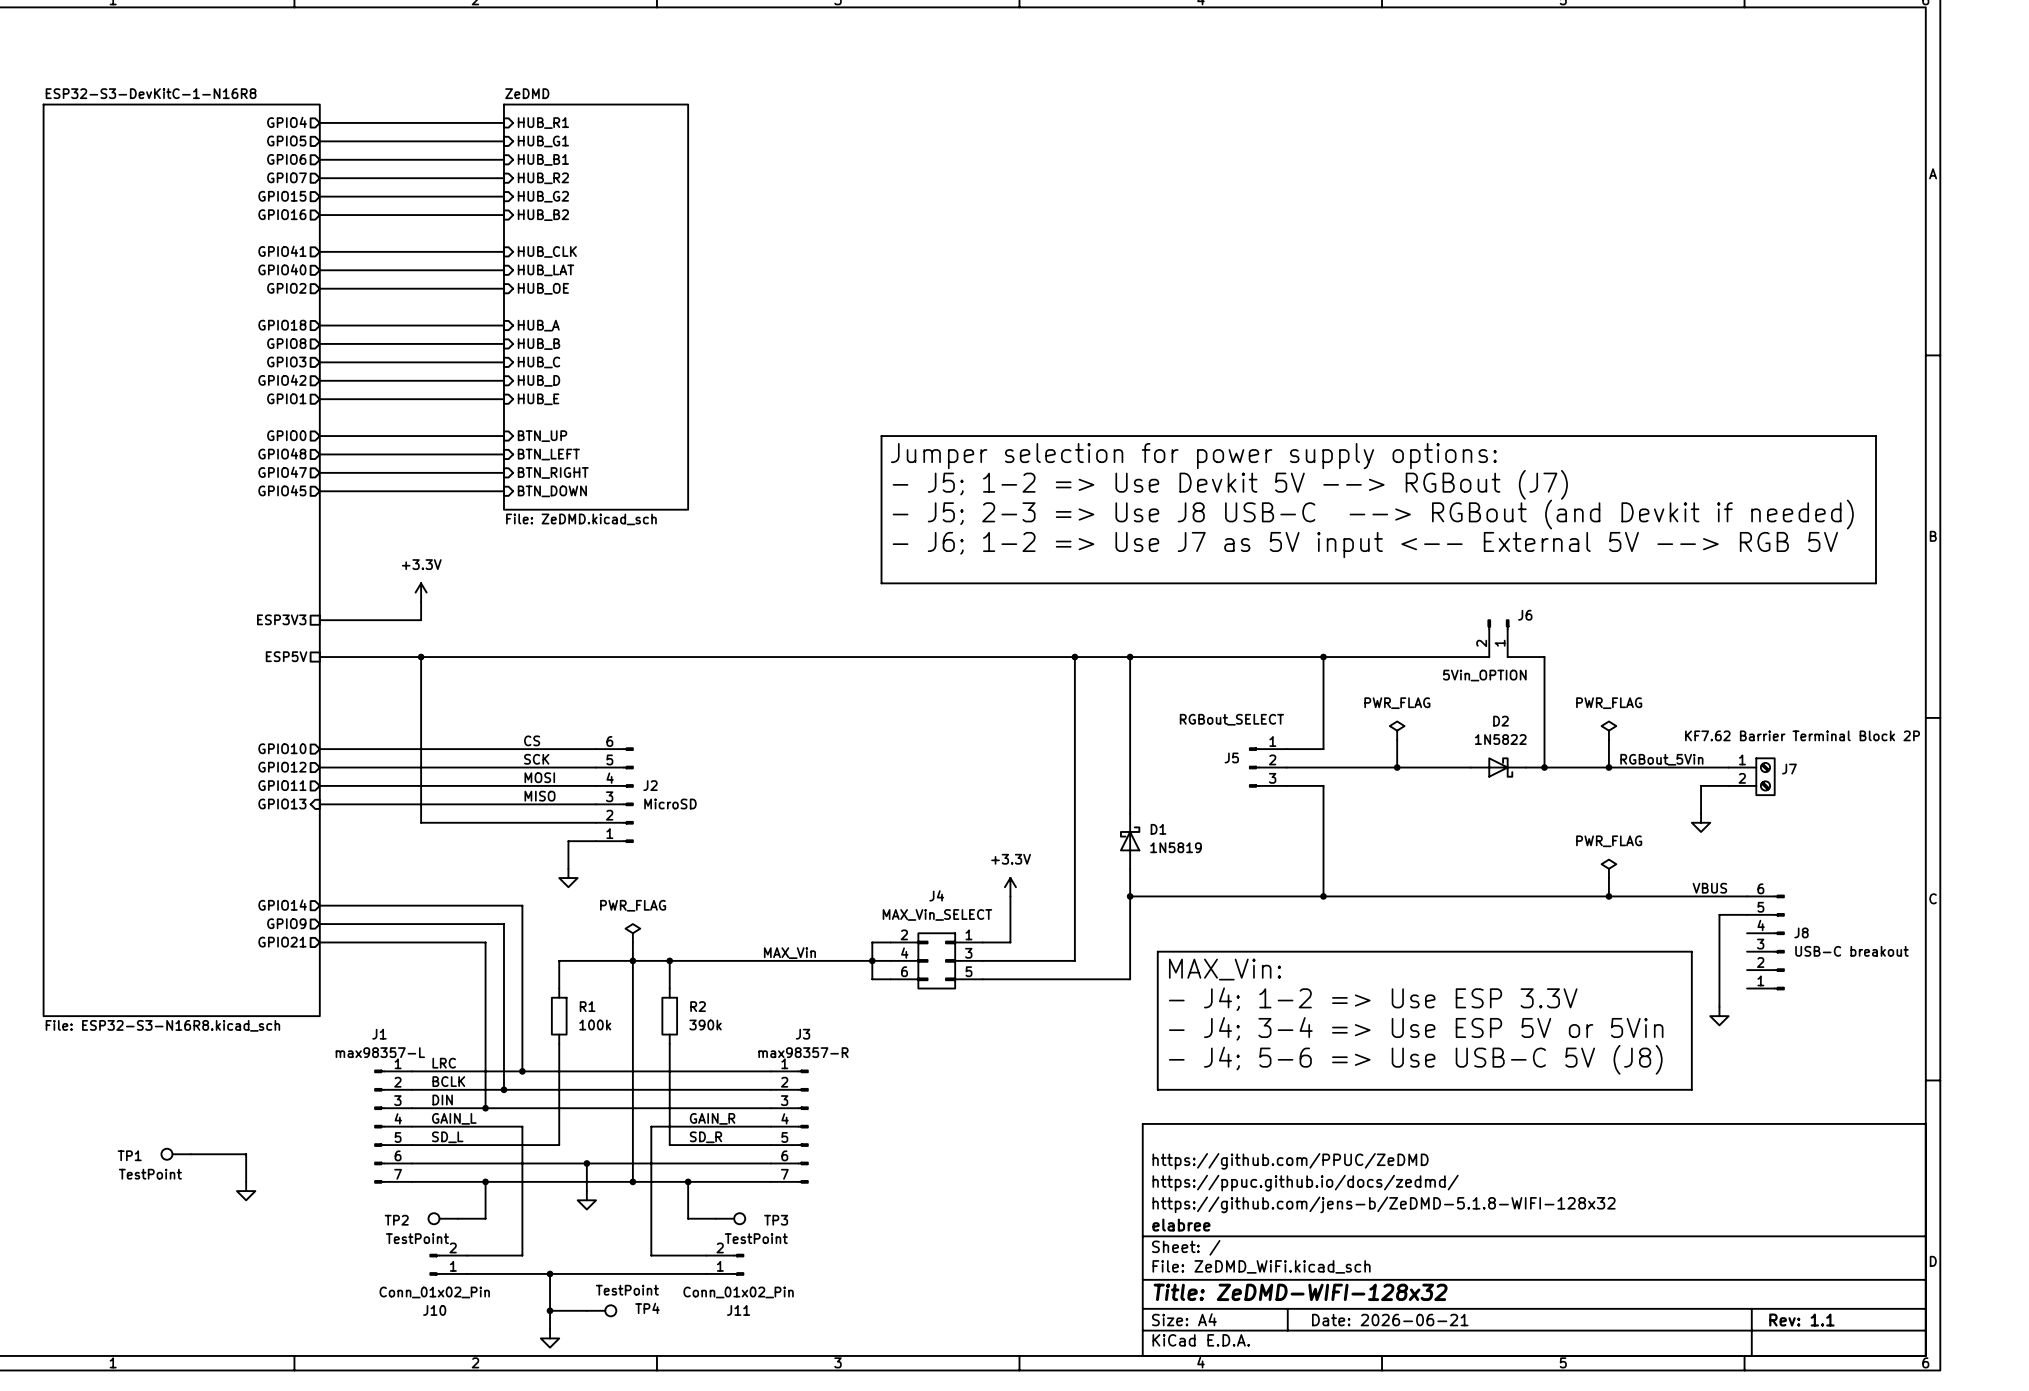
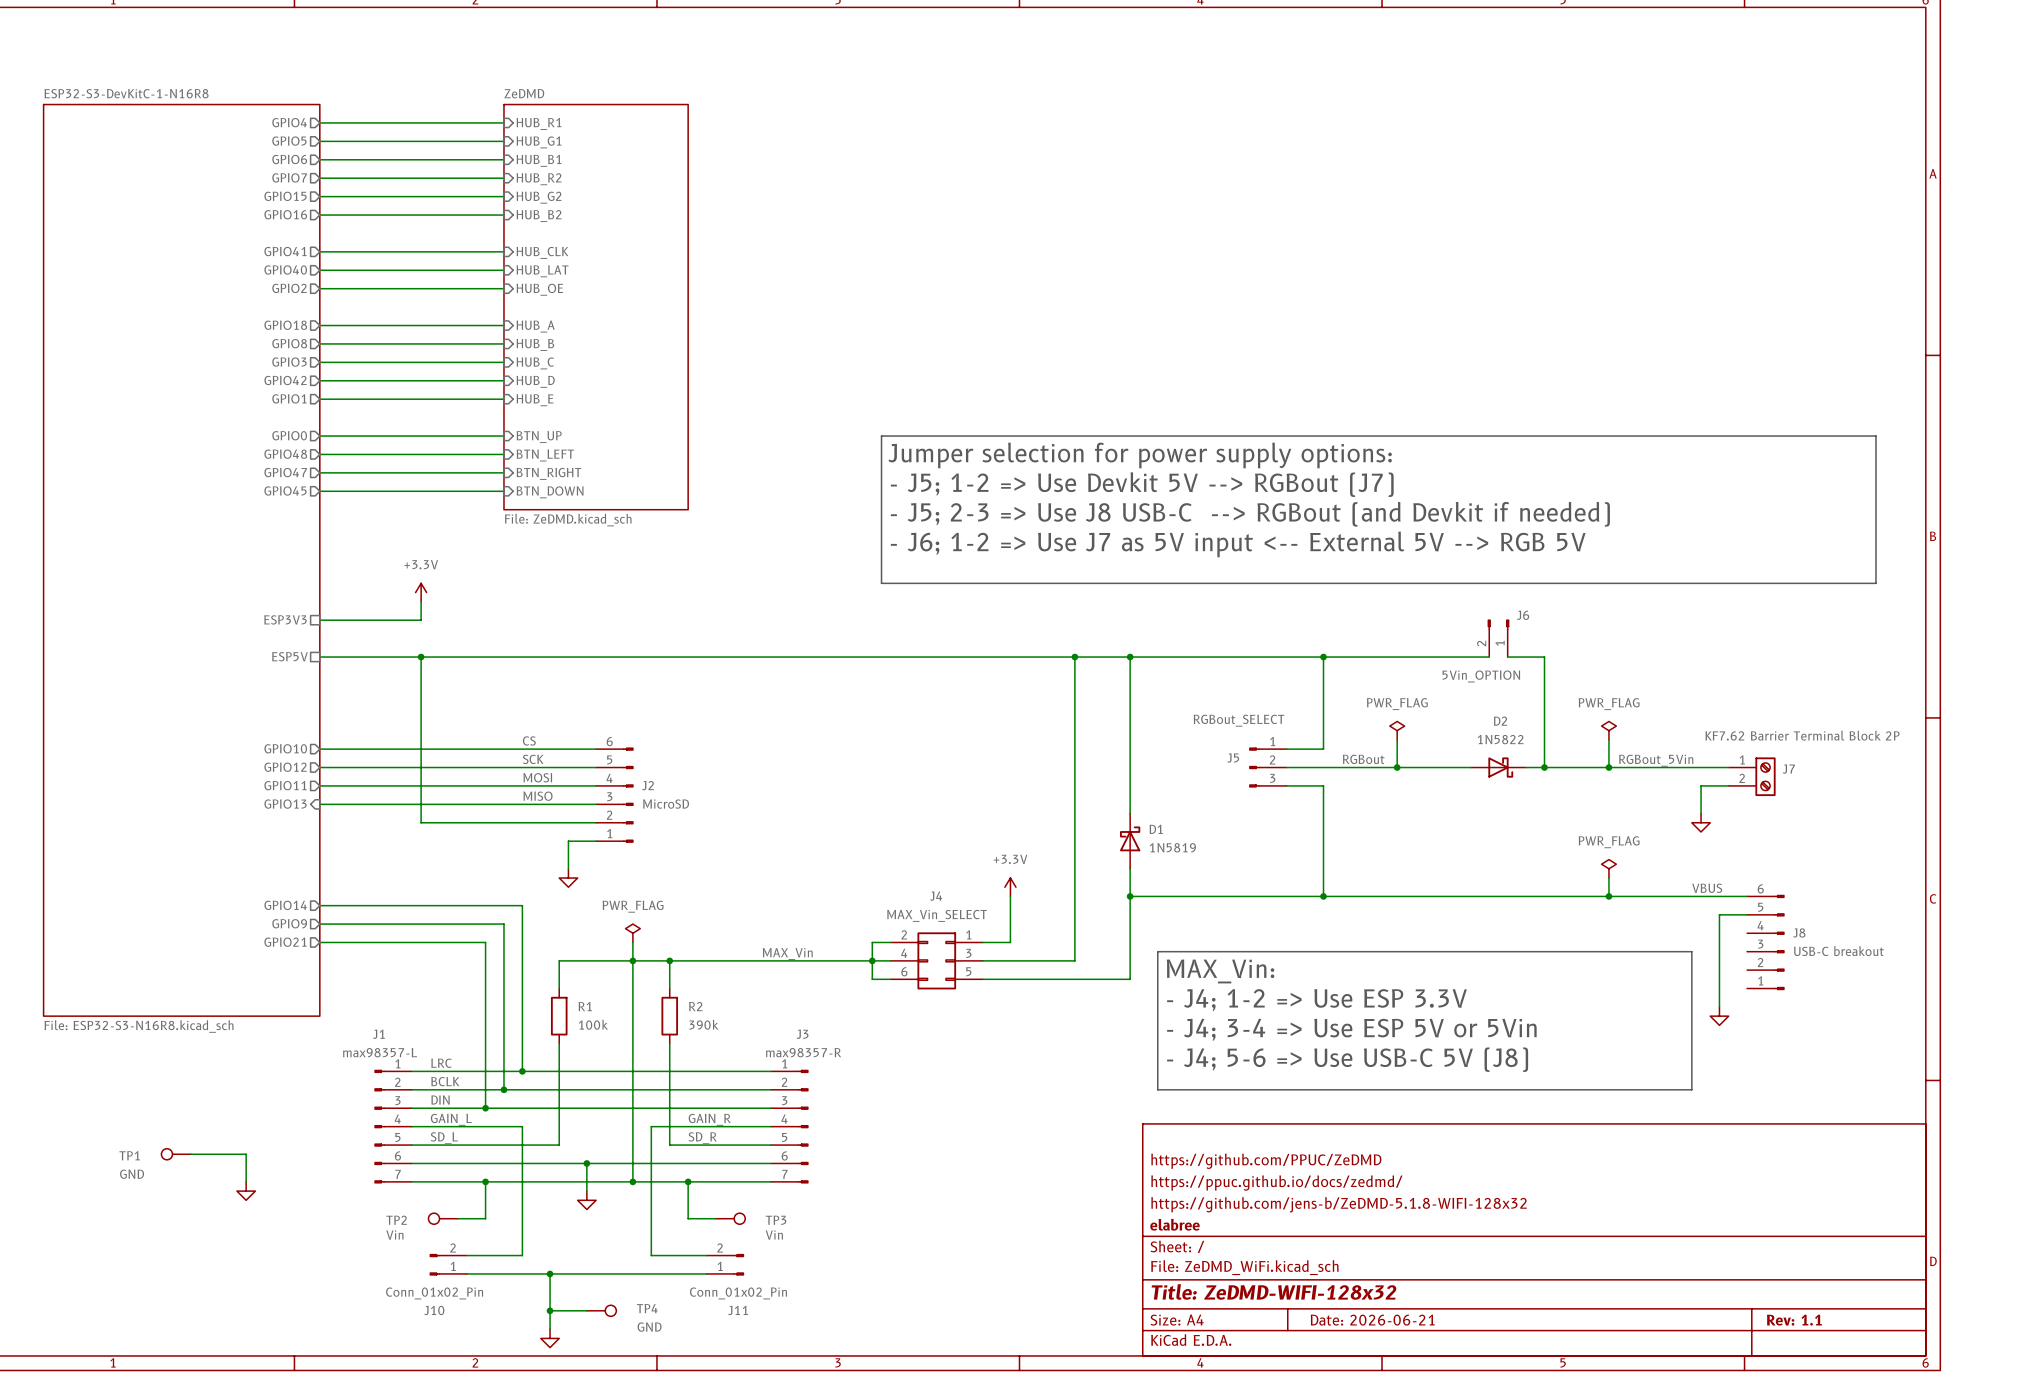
label: none -> RGBout (1363, 759)
TP1 value: TestPoint (150, 1174) -> GND (132, 1174)
TP2 value: TestPoint (417, 1238) -> Vin (394, 1235)
TP3 value: TestPoint (756, 1238) -> Vin (774, 1235)
TP4 value: TestPoint (627, 1290) -> GND (649, 1327)

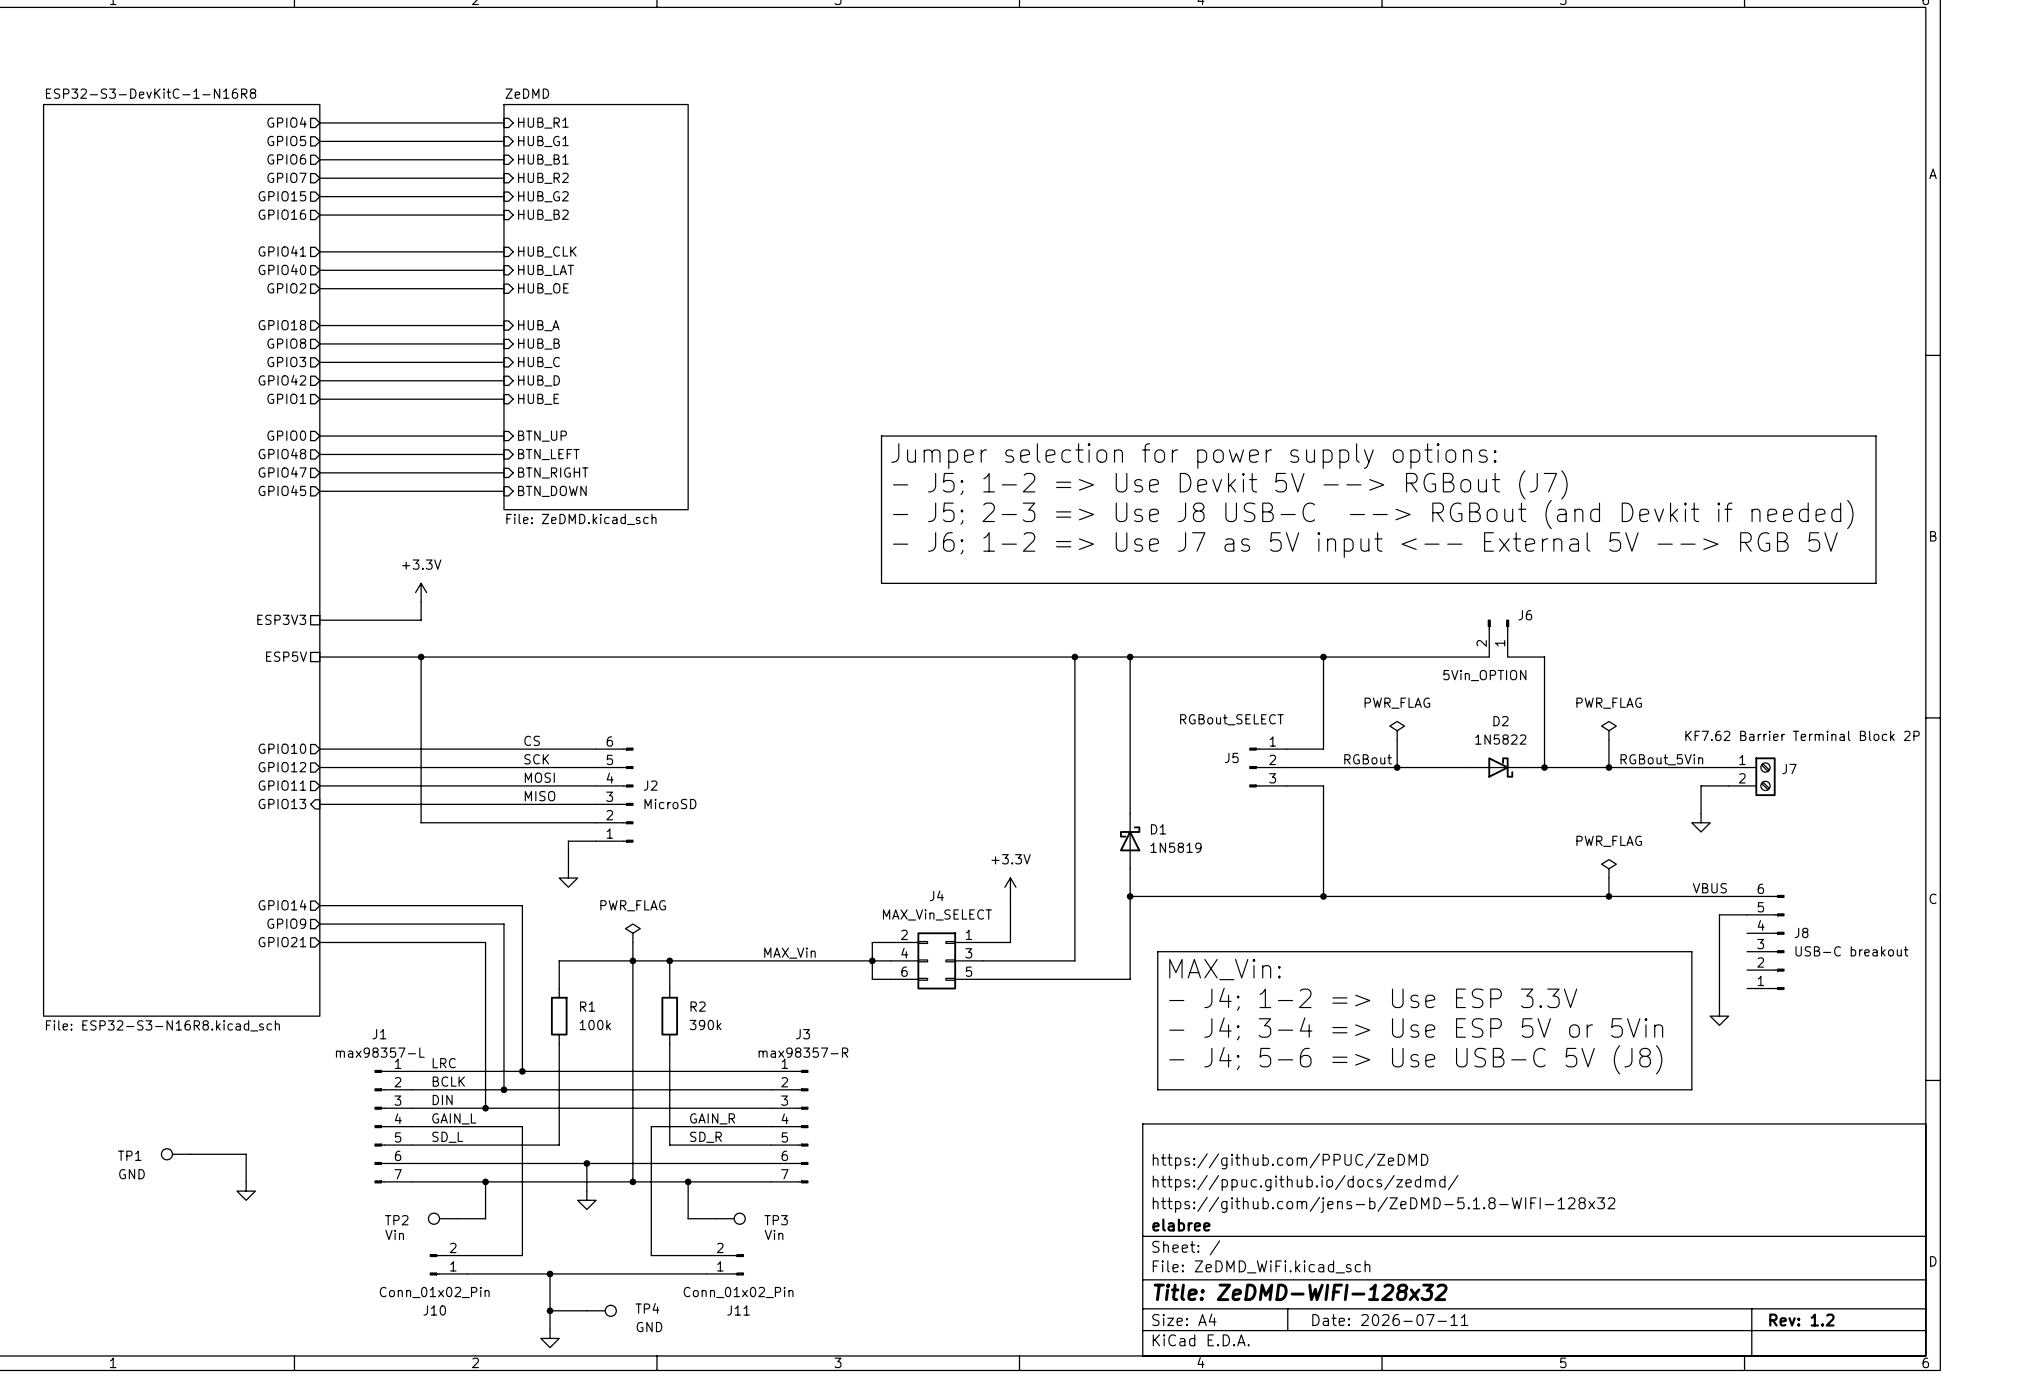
title block: Date: 2026-06-21 (1372, 1320) -> Date: 2026-07-11 (1390, 1320)
title block: Rev: 1.1 (1794, 1320) -> Rev: 1.2 (1801, 1320)

